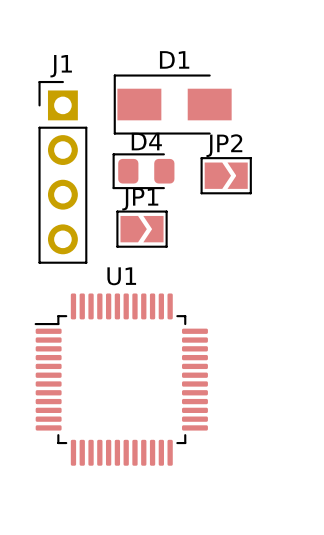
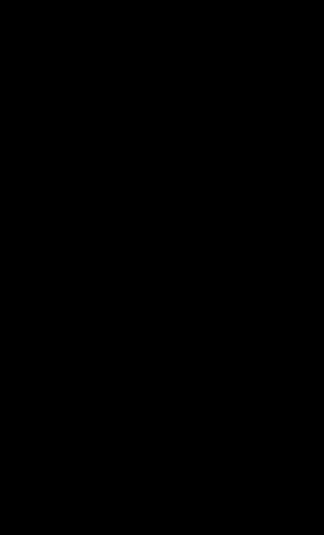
D1: (172, 104) -> none
D4: (143, 171) -> none
J1: (62, 172) -> none
JP2: (226, 175) -> none
JP1: (142, 229) -> none
U1: (121, 379) -> none

